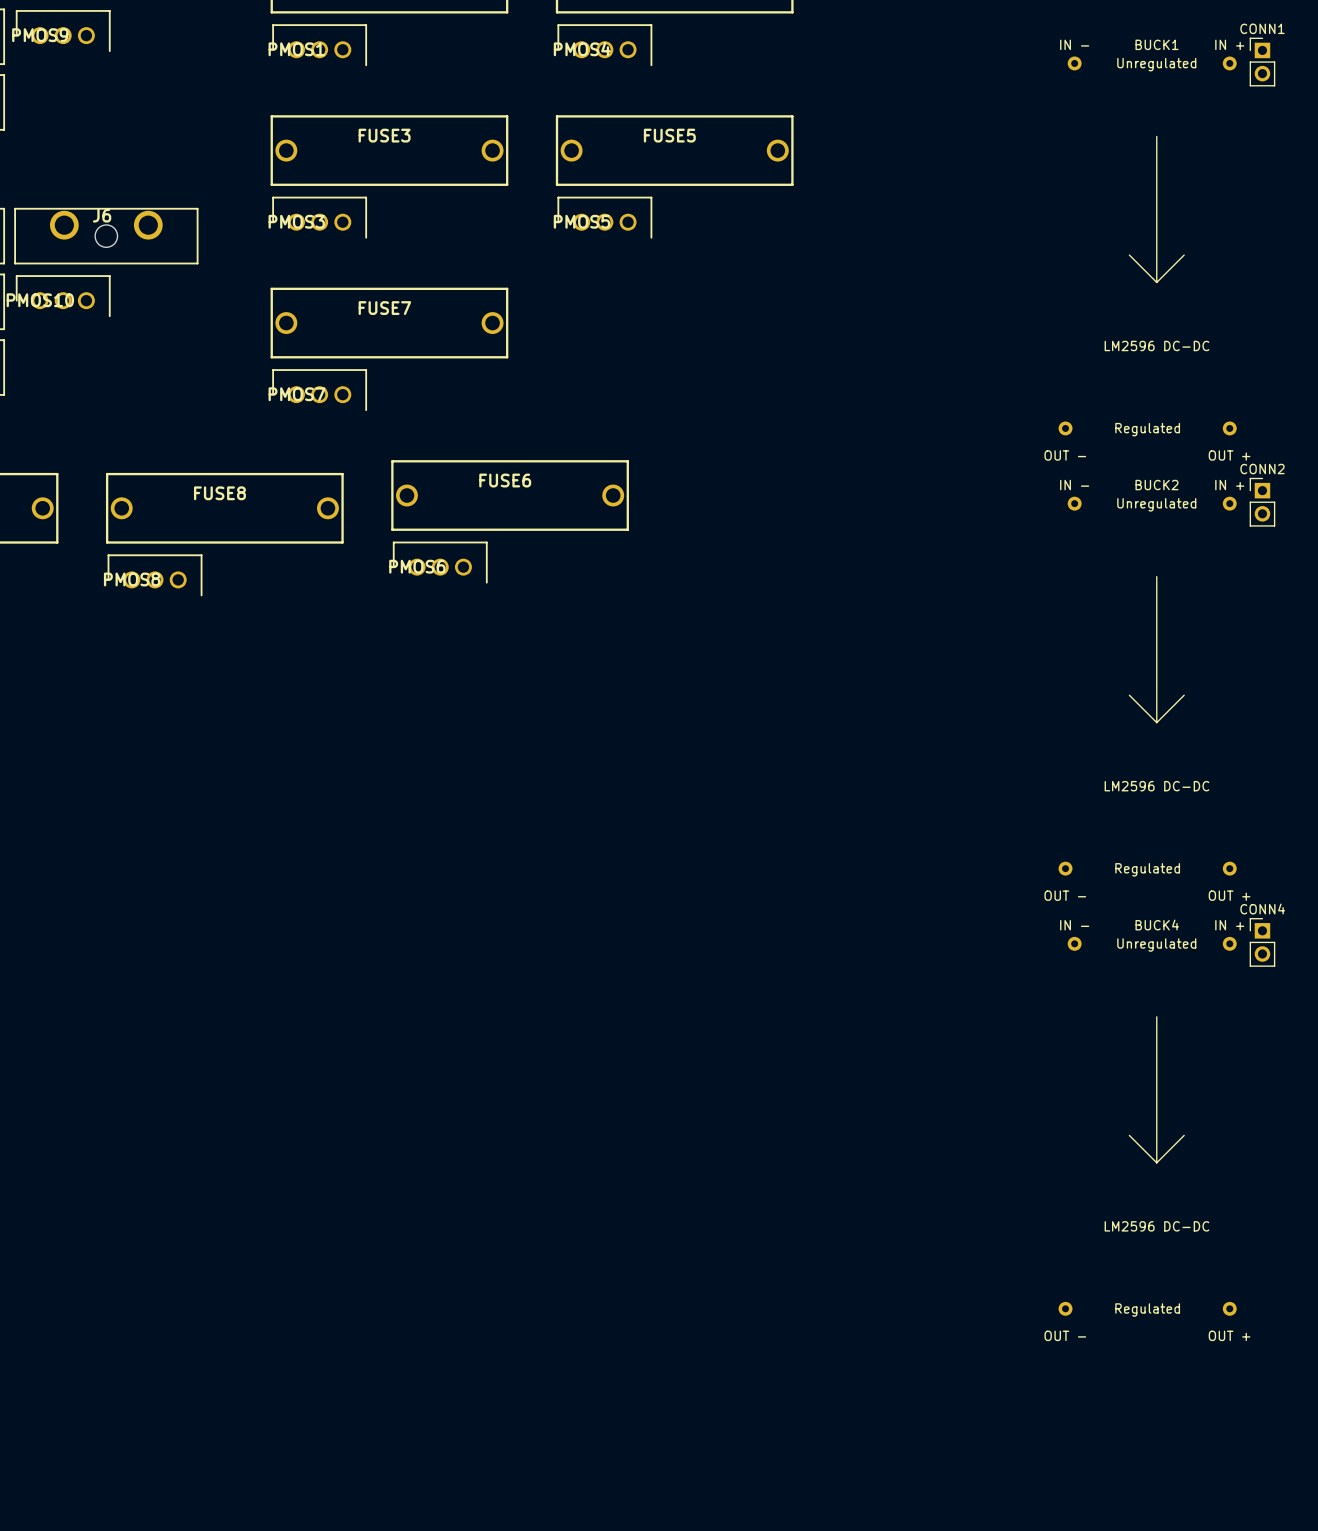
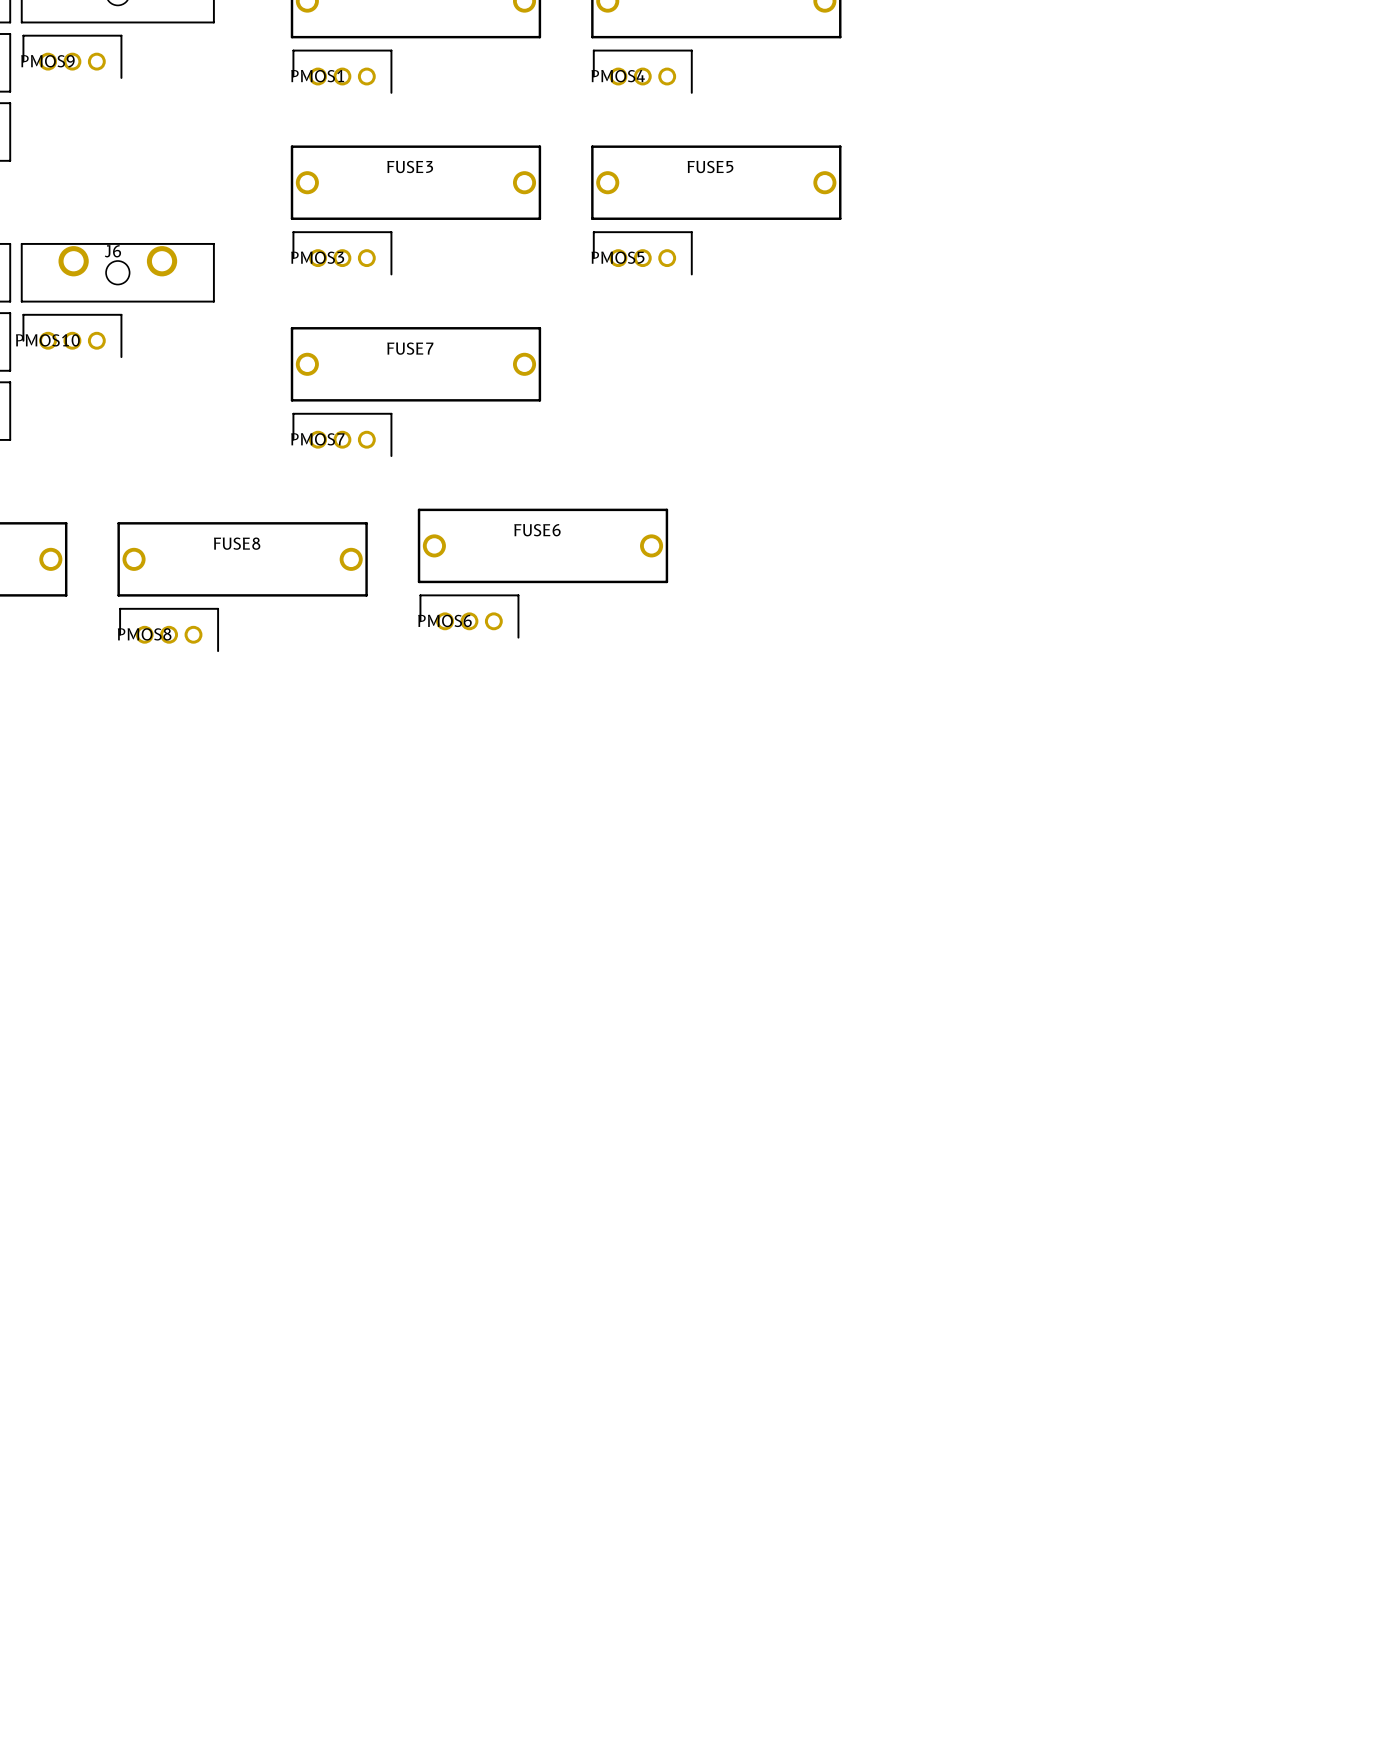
CONN1: (1262, 62) -> none
BUCK1: (1147, 245) -> none
CONN2: (1262, 502) -> none
BUCK2: (1147, 686) -> none
CONN4: (1262, 942) -> none
BUCK4: (1147, 1126) -> none

